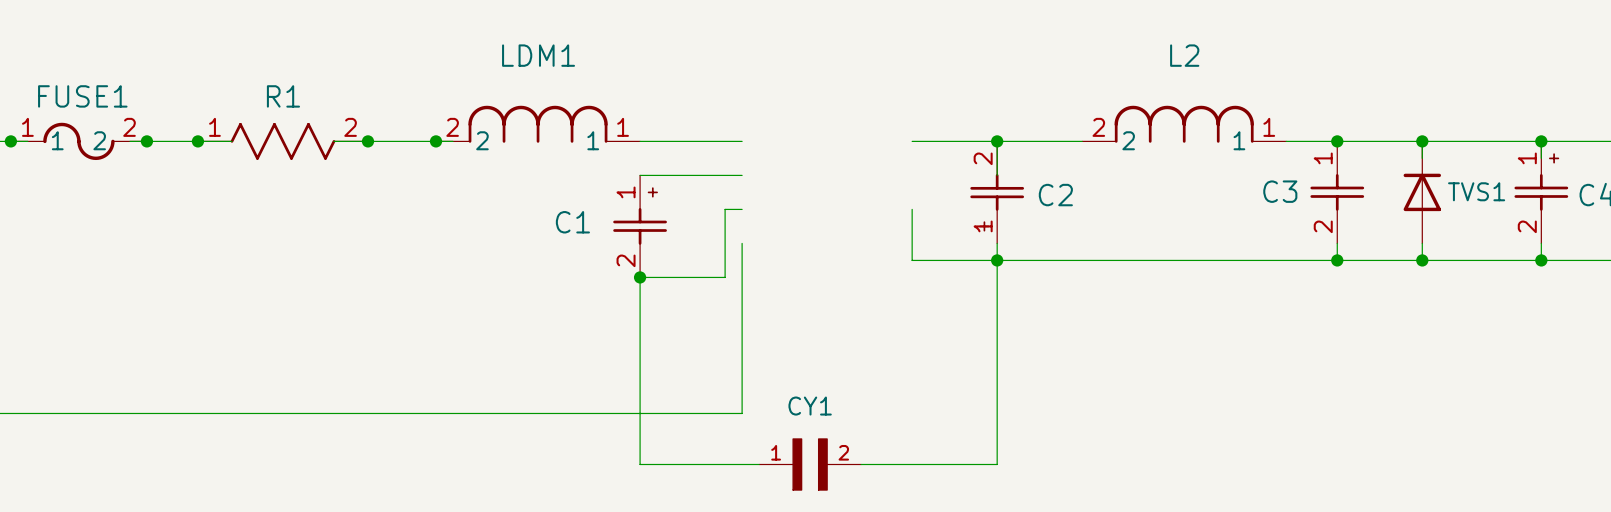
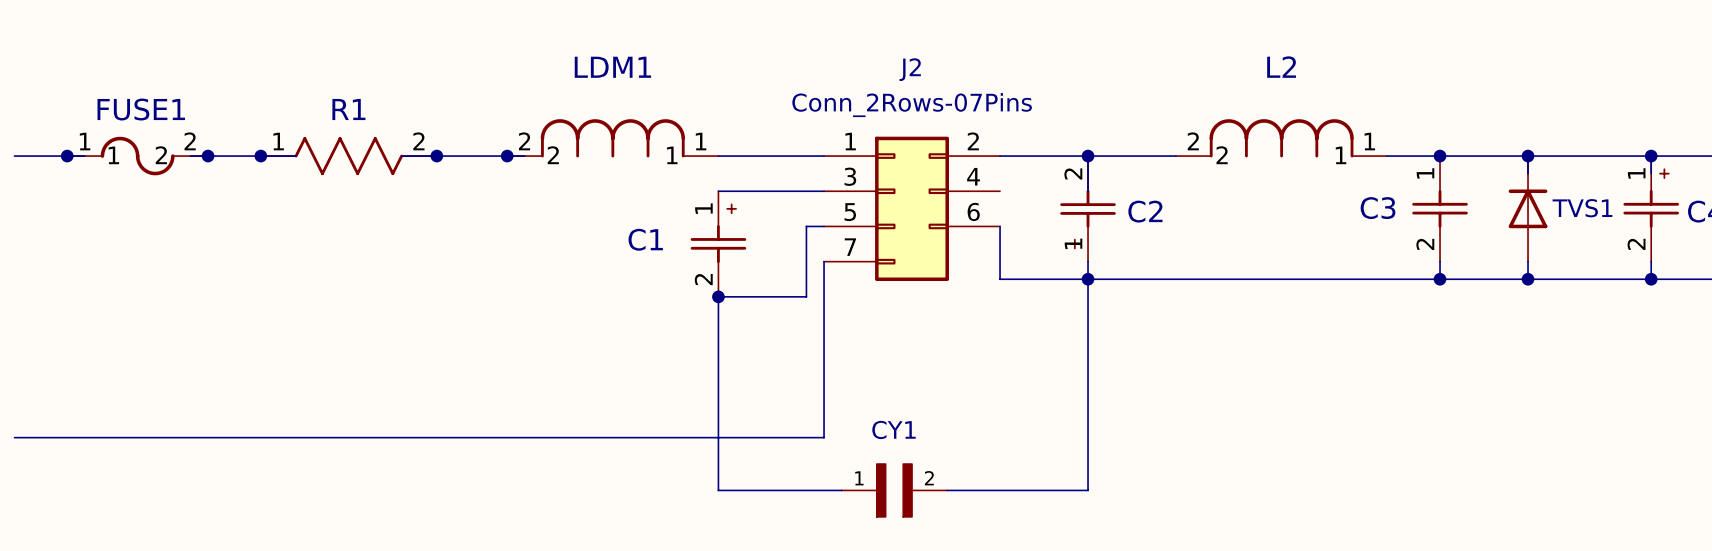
J2: none -> Conn_2Rows-07Pins (912, 208)

